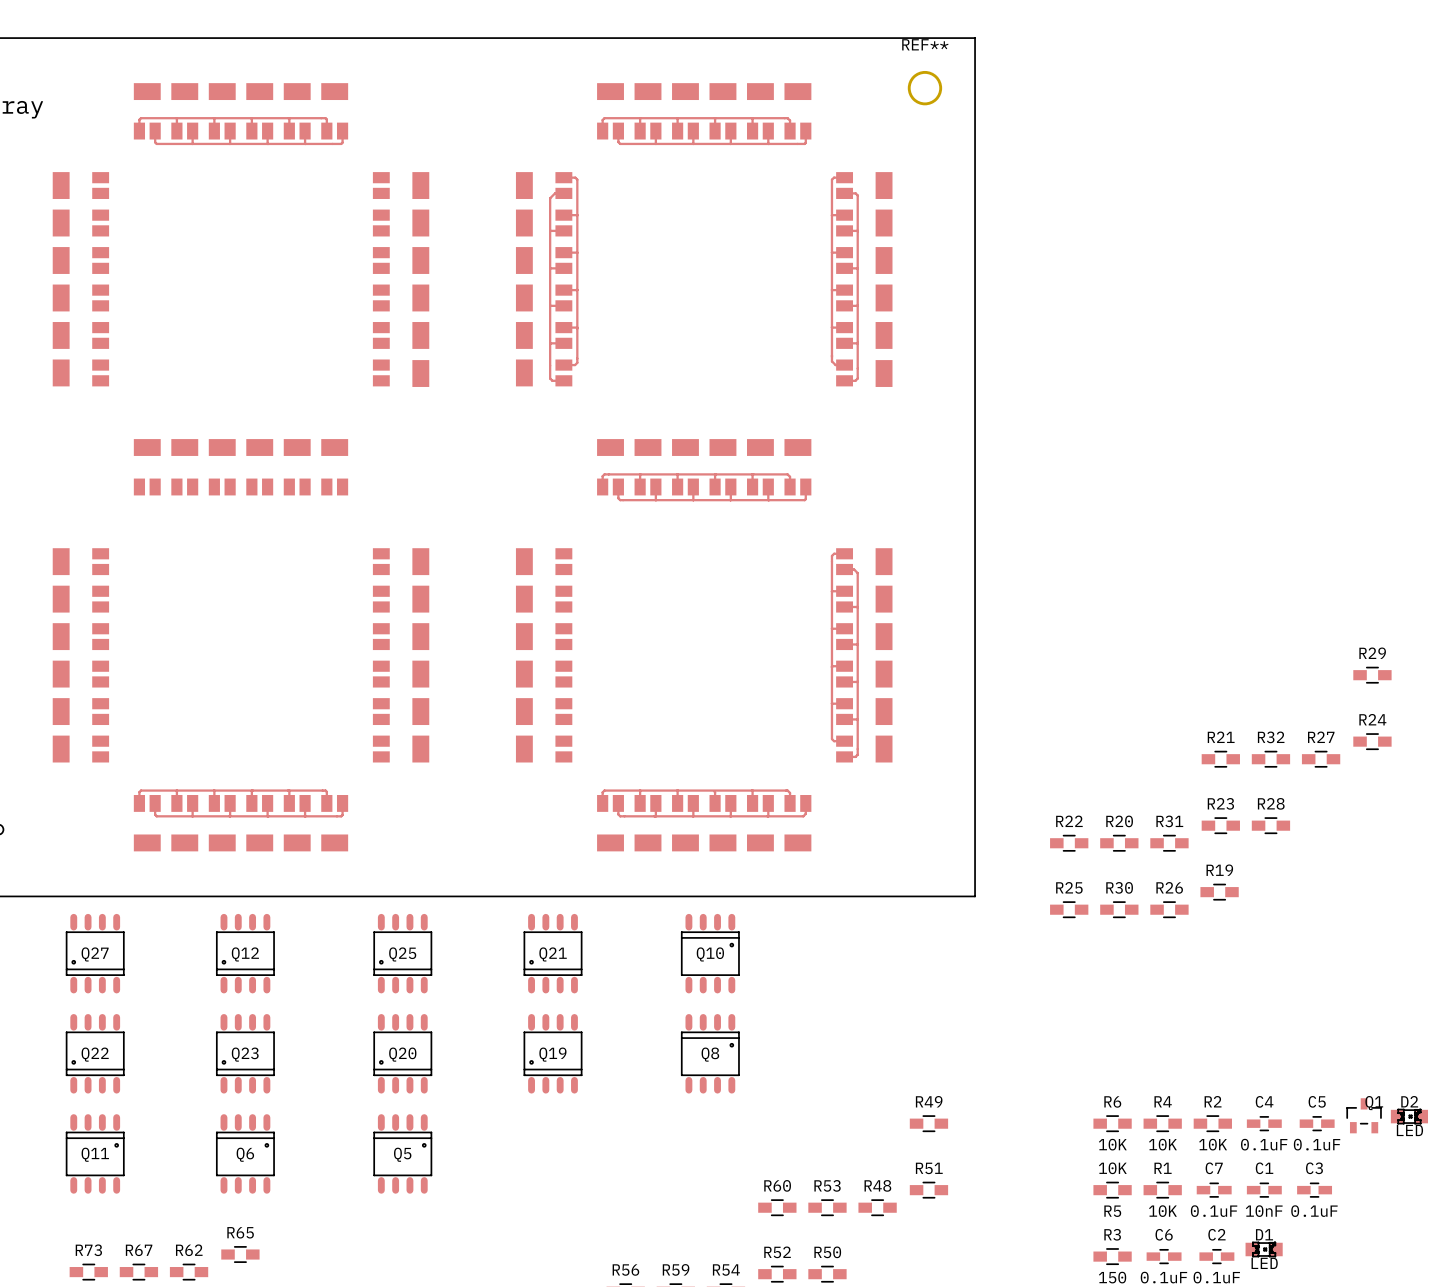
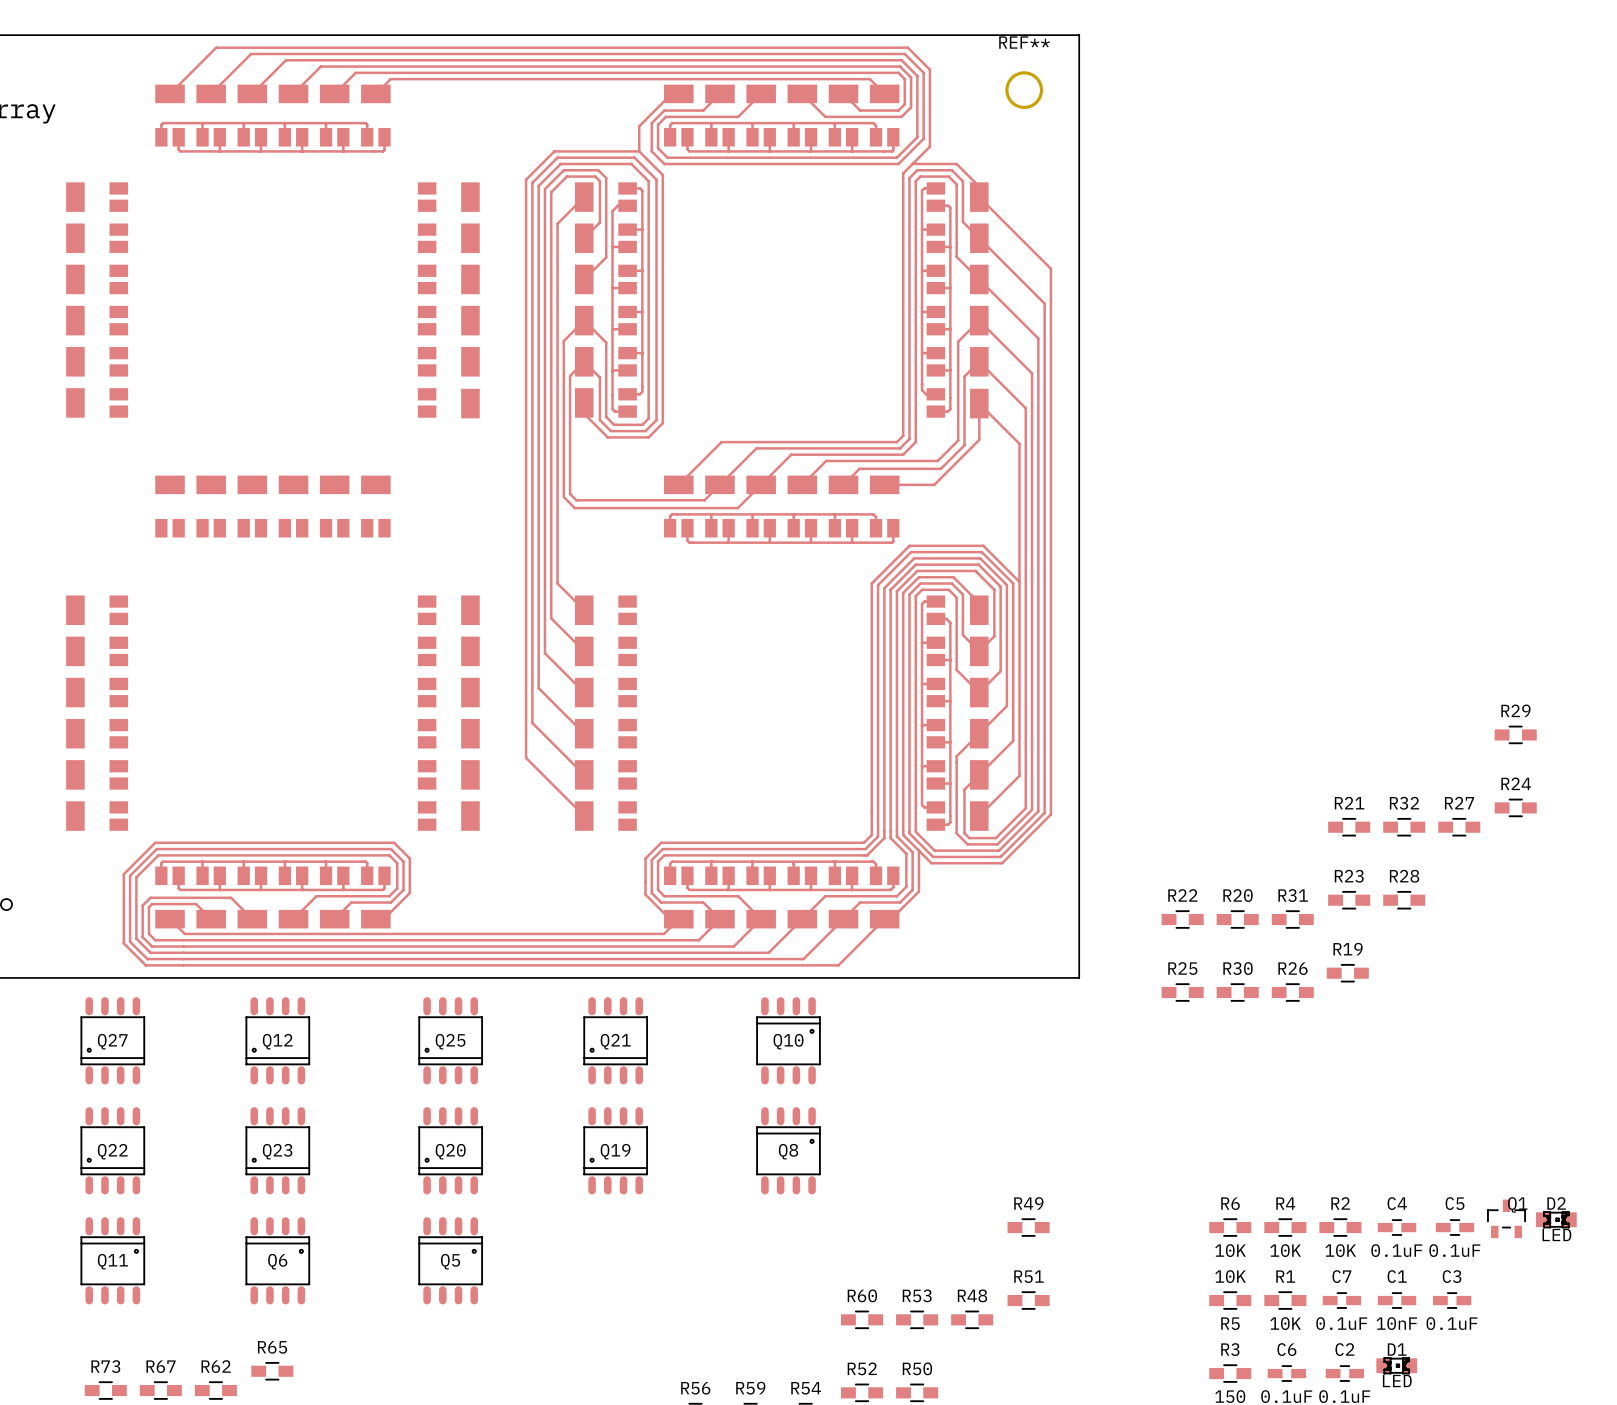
track: none -> (170, 93) (216, 47) (907, 47) (929, 69) (929, 146) (903, 173) (903, 435) (896, 442) (721, 442) (678, 484)
track: none -> (211, 93) (251, 53) (904, 53) (923, 72) (923, 138) (898, 163) (664, 163) (651, 151) (651, 123) (664, 110) (703, 110) (719, 93)
track: none -> (252, 93) (285, 60) (901, 60) (917, 75) (917, 137) (896, 157) (667, 157) (658, 148) (658, 124) (665, 116) (738, 116) (761, 93)
track: none -> (293, 93) (320, 66) (900, 66) (911, 77) (911, 107) (901, 116) (825, 116) (802, 93)
track: none -> (334, 93) (355, 72) (898, 72) (904, 79) (904, 104) (898, 110) (860, 110) (843, 93)
track: none -> (375, 93) (390, 79) (869, 79) (884, 93)
track: none -> (671, 93) (639, 126) (639, 151)
track: none -> (639, 151) (554, 151) (526, 179) (526, 757) (584, 816)
track: none -> (639, 151) (662, 174) (662, 423) (648, 437) (607, 437) (584, 413)
track: none -> (912, 163) (956, 163) (979, 186)
track: none -> (584, 197) (557, 223) (557, 583) (584, 610)
track: none -> (979, 197) (1050, 268) (1050, 814) (1002, 863) (931, 863) (903, 834) (903, 592) (918, 577) (953, 577) (979, 603)
track: none -> (584, 238) (599, 222) (599, 181) (595, 176) (566, 176) (551, 192) (551, 618) (584, 651)
track: none -> (584, 279) (606, 257) (606, 178) (598, 170) (563, 170) (544, 189) (544, 653) (584, 692)
track: none -> (802, 484) (826, 460) (937, 460) (958, 440) (958, 341) (979, 320) (1032, 373) (1032, 809) (997, 844) (967, 844) (956, 833) (956, 756) (1006, 706) (1006, 585) (980, 558) (914, 558) (884, 588) (884, 838) (867, 855) (664, 855) (658, 861) (658, 889) (664, 896) (738, 896) (761, 919) (733, 946) (152, 946) (142, 937) (142, 905) (150, 897) (230, 897) (252, 919)
track: none -> (843, 484) (859, 468) (940, 468) (964, 445) (964, 376) (979, 361) (1025, 408) (1025, 808) (995, 838) (969, 838) (964, 833) (964, 789) (1013, 740) (1013, 583) (981, 552) (911, 552) (878, 585) (878, 836) (865, 849) (662, 849) (651, 860) (651, 893) (661, 902) (703, 902) (719, 919) (698, 940) (155, 940) (148, 933) (148, 907) (152, 904) (196, 904) (211, 919)
track: none -> (884, 484) (934, 484) (979, 439) (979, 403) (1019, 443) (1019, 775) (979, 816)
track: none -> (563, 495) (563, 341) (584, 320) (606, 342) (606, 416) (614, 424) (642, 424) (648, 418) (648, 181) (631, 163) (560, 163) (538, 185) (538, 688) (584, 733)
track: none -> (563, 497) (574, 508) (737, 508) (791, 454) (903, 454) (915, 442) (915, 181) (920, 176) (948, 176) (956, 184) (956, 256) (1038, 338) (1038, 811) (999, 850) (934, 850) (915, 831) (915, 596) (922, 589) (948, 589) (956, 597) (956, 669) (979, 692) (1000, 671) (1000, 586) (978, 564) (915, 564) (890, 589) (890, 838) (906, 853) (906, 886) (896, 896) (825, 896) (768, 952) (150, 952) (136, 938) (136, 877) (158, 855) (389, 855) (397, 863) (397, 888) (389, 896) (316, 896) (293, 919)
track: none -> (1019, 581) (983, 545) (909, 545) (871, 583) (871, 834) (863, 842) (661, 842) (645, 858) (645, 894) (670, 919)
track: none -> (584, 774) (532, 723) (532, 182) (557, 157) (634, 157) (656, 179) (656, 420) (645, 431) (610, 431) (599, 420) (599, 377) (584, 361) (570, 375) (570, 493) (576, 500) (704, 500) (756, 448) (900, 448) (909, 438) (909, 178) (917, 170) (951, 170) (962, 181) (962, 221) (1044, 303) (1044, 812) (1000, 856) (933, 856) (909, 833) (909, 594) (920, 583) (951, 583) (962, 594) (962, 635) (979, 651) (994, 636) (994, 589) (975, 570) (917, 570) (896, 591) (896, 836) (912, 852) (912, 889) (900, 902) (860, 902) (803, 959) (147, 959) (130, 941) (130, 875) (156, 849) (390, 849) (403, 861) (403, 889) (390, 902) (351, 902) (334, 919)
track: none -> (918, 850) (918, 891) (891, 919)
track: none -> (170, 919) (184, 933) (664, 933) (678, 919)
track: none -> (383, 919) (409, 893) (409, 858) (394, 842) (155, 842) (123, 874) (123, 943) (145, 965) (838, 965) (884, 919)

